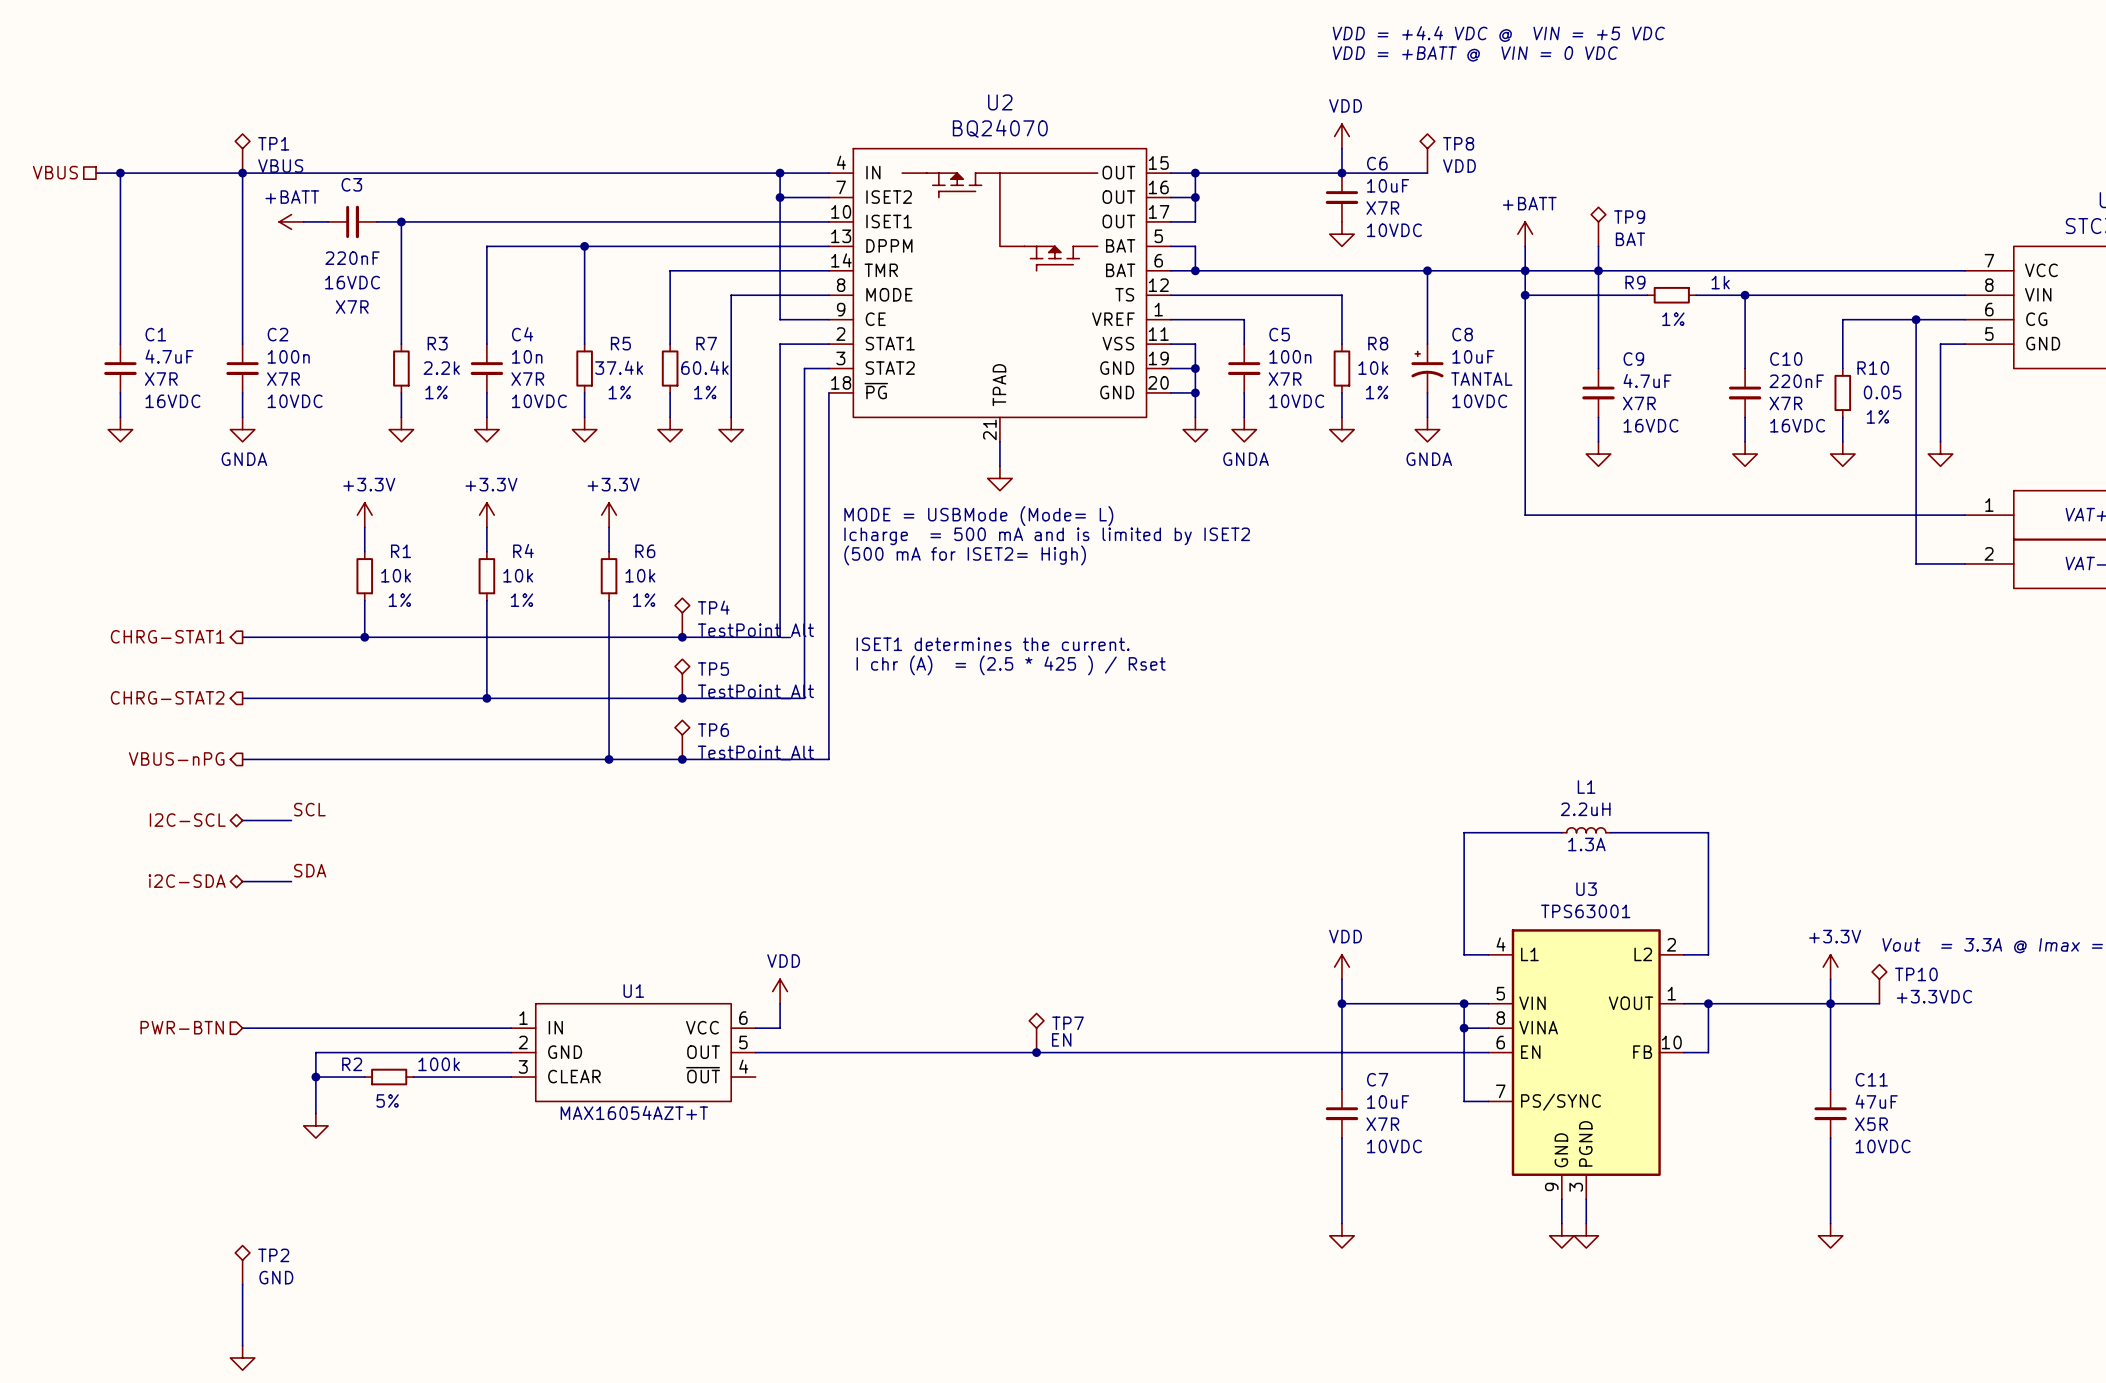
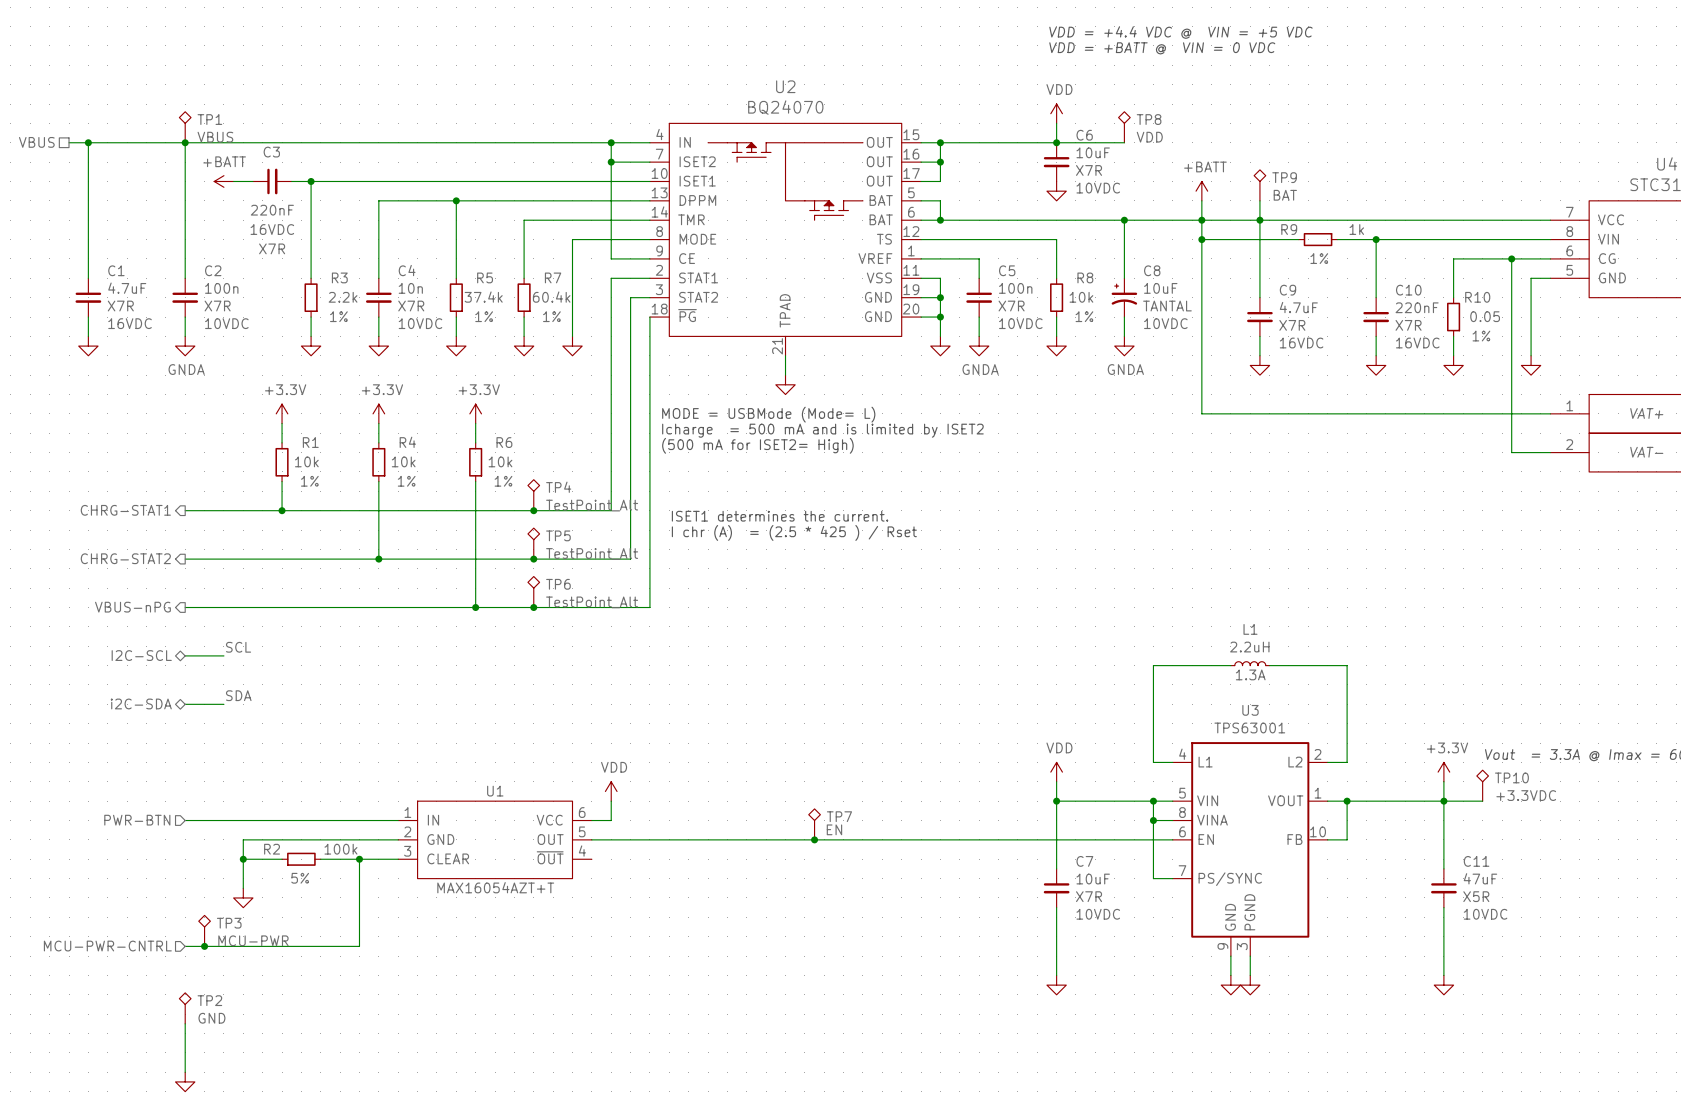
wire: none -> (359, 859) (359, 946) (185, 946)
junction: none -> (359, 859)
TP3: none -> MCU-PWR (204, 930)
hierarchical label: none -> MCU-PWR-CNTRL (107, 946)
junction: none -> (204, 946)

